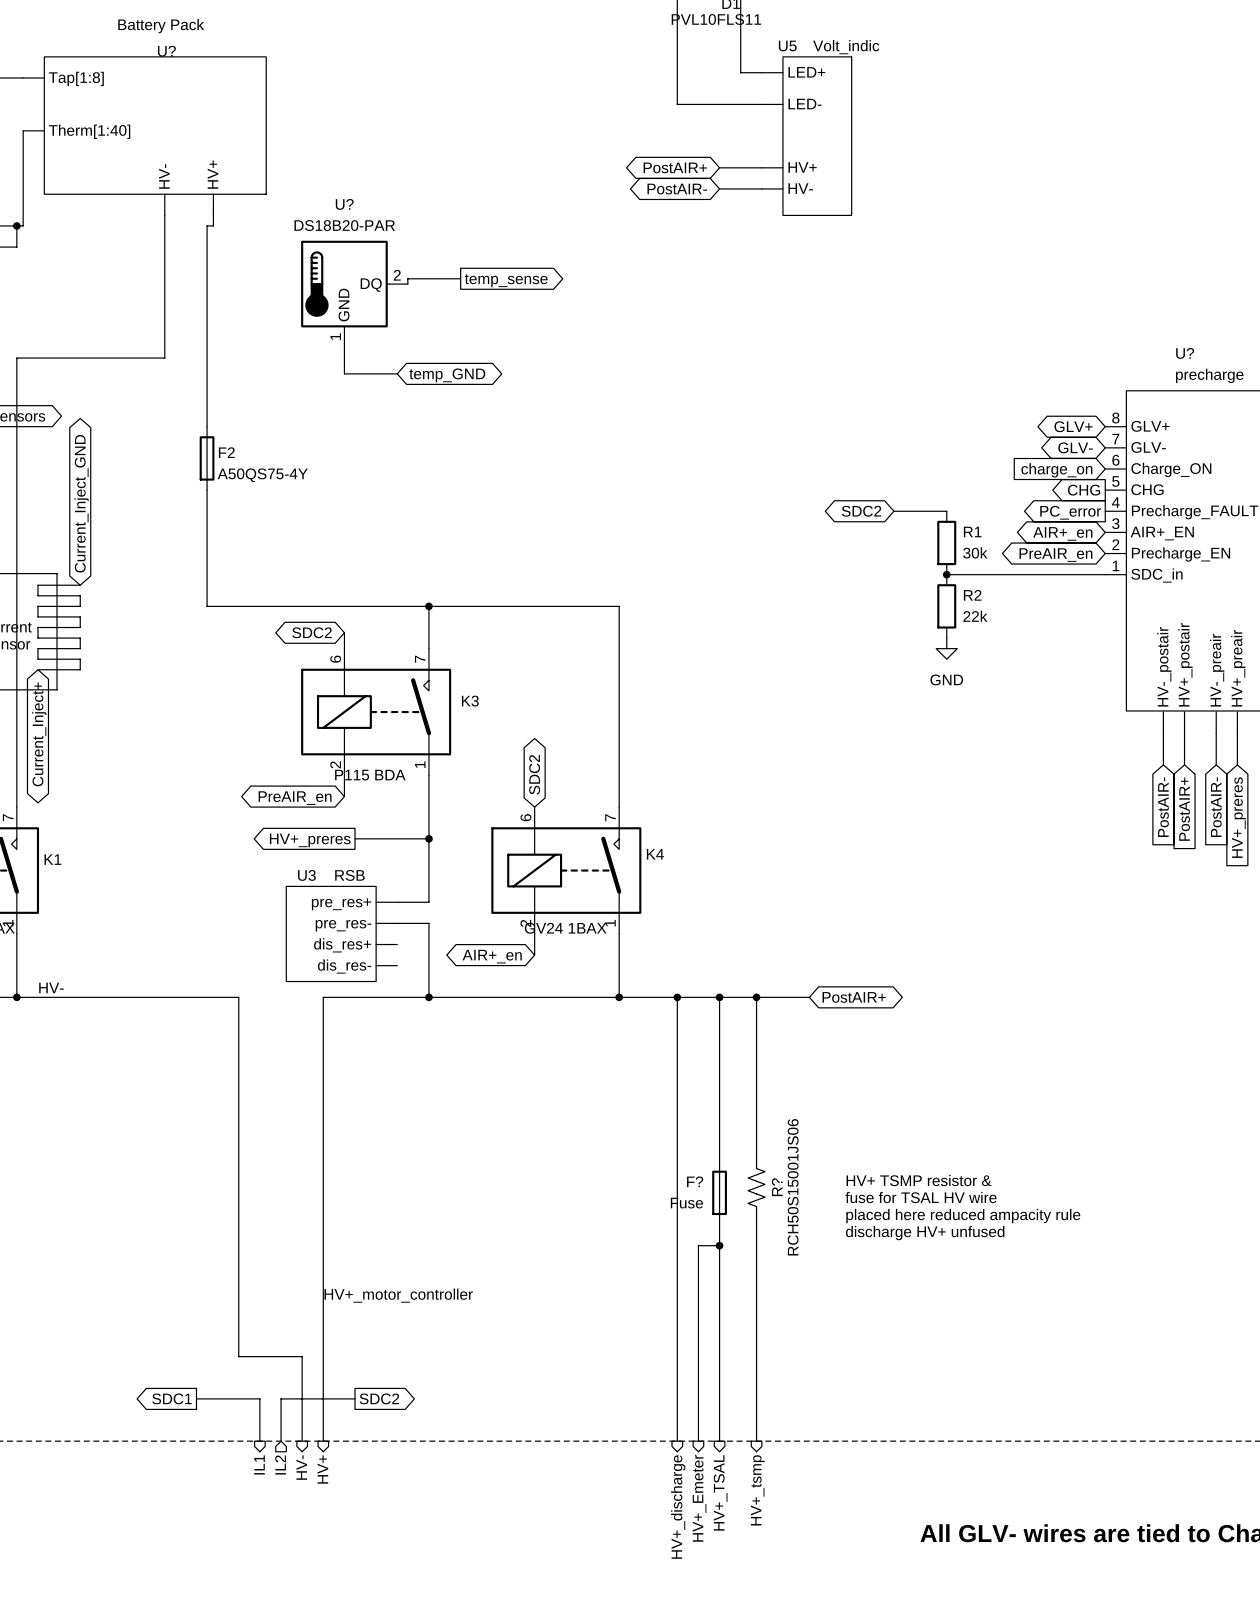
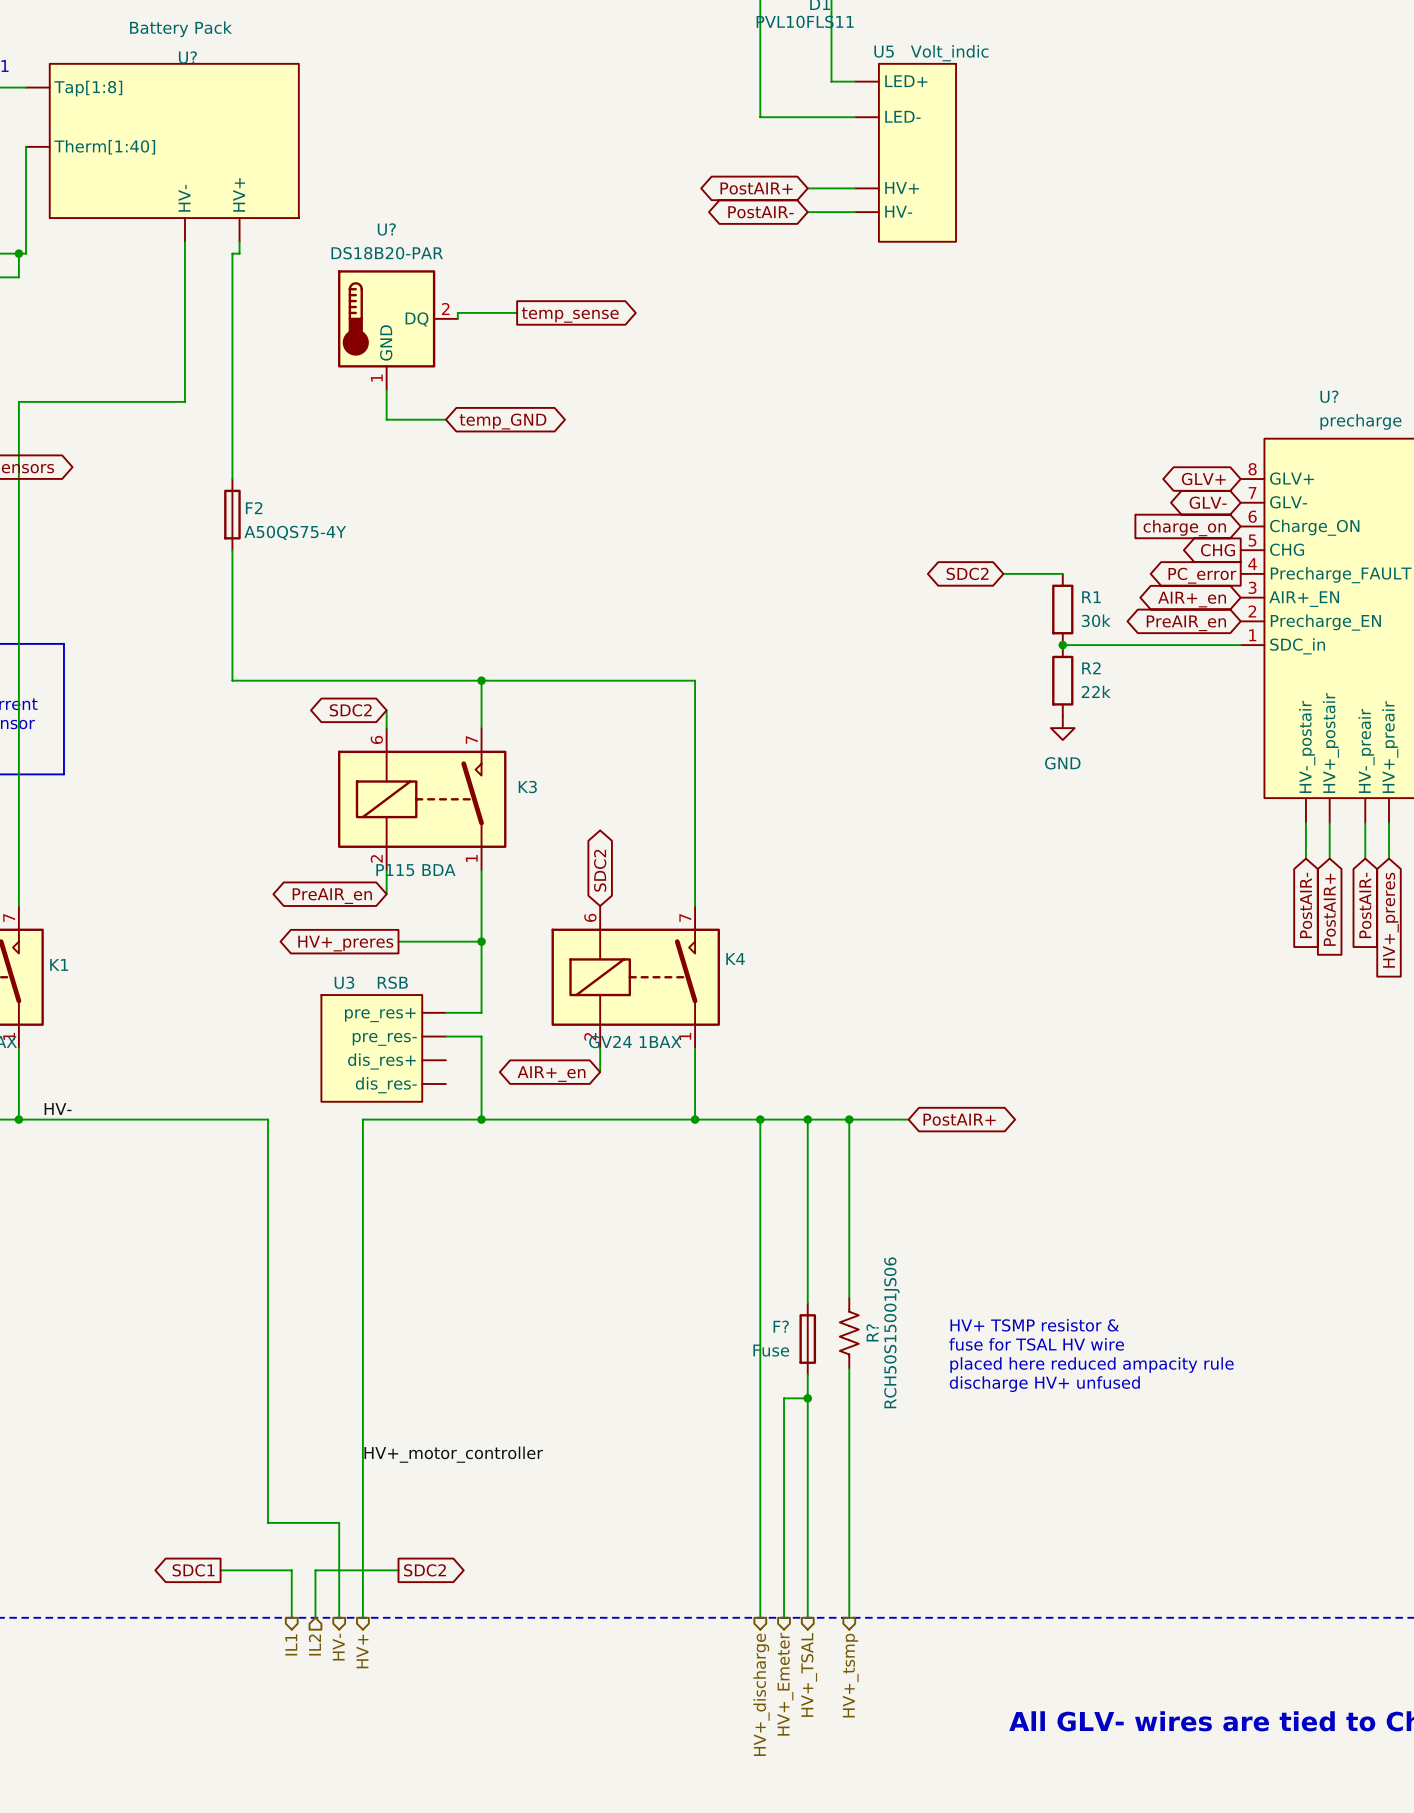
global label: Current_Inject_GND (81, 503) -> none
wire: (80, 585) (37, 585) (37, 595) (80, 595) (80, 606) (37, 606) (37, 616) (80, 616) (80, 627) (37, 627) (37, 638) (80, 638) (80, 648) (37, 648) (37, 659) (80, 659) (80, 669) (37, 669) -> none
global label: Current_Inject+ (39, 734) -> none

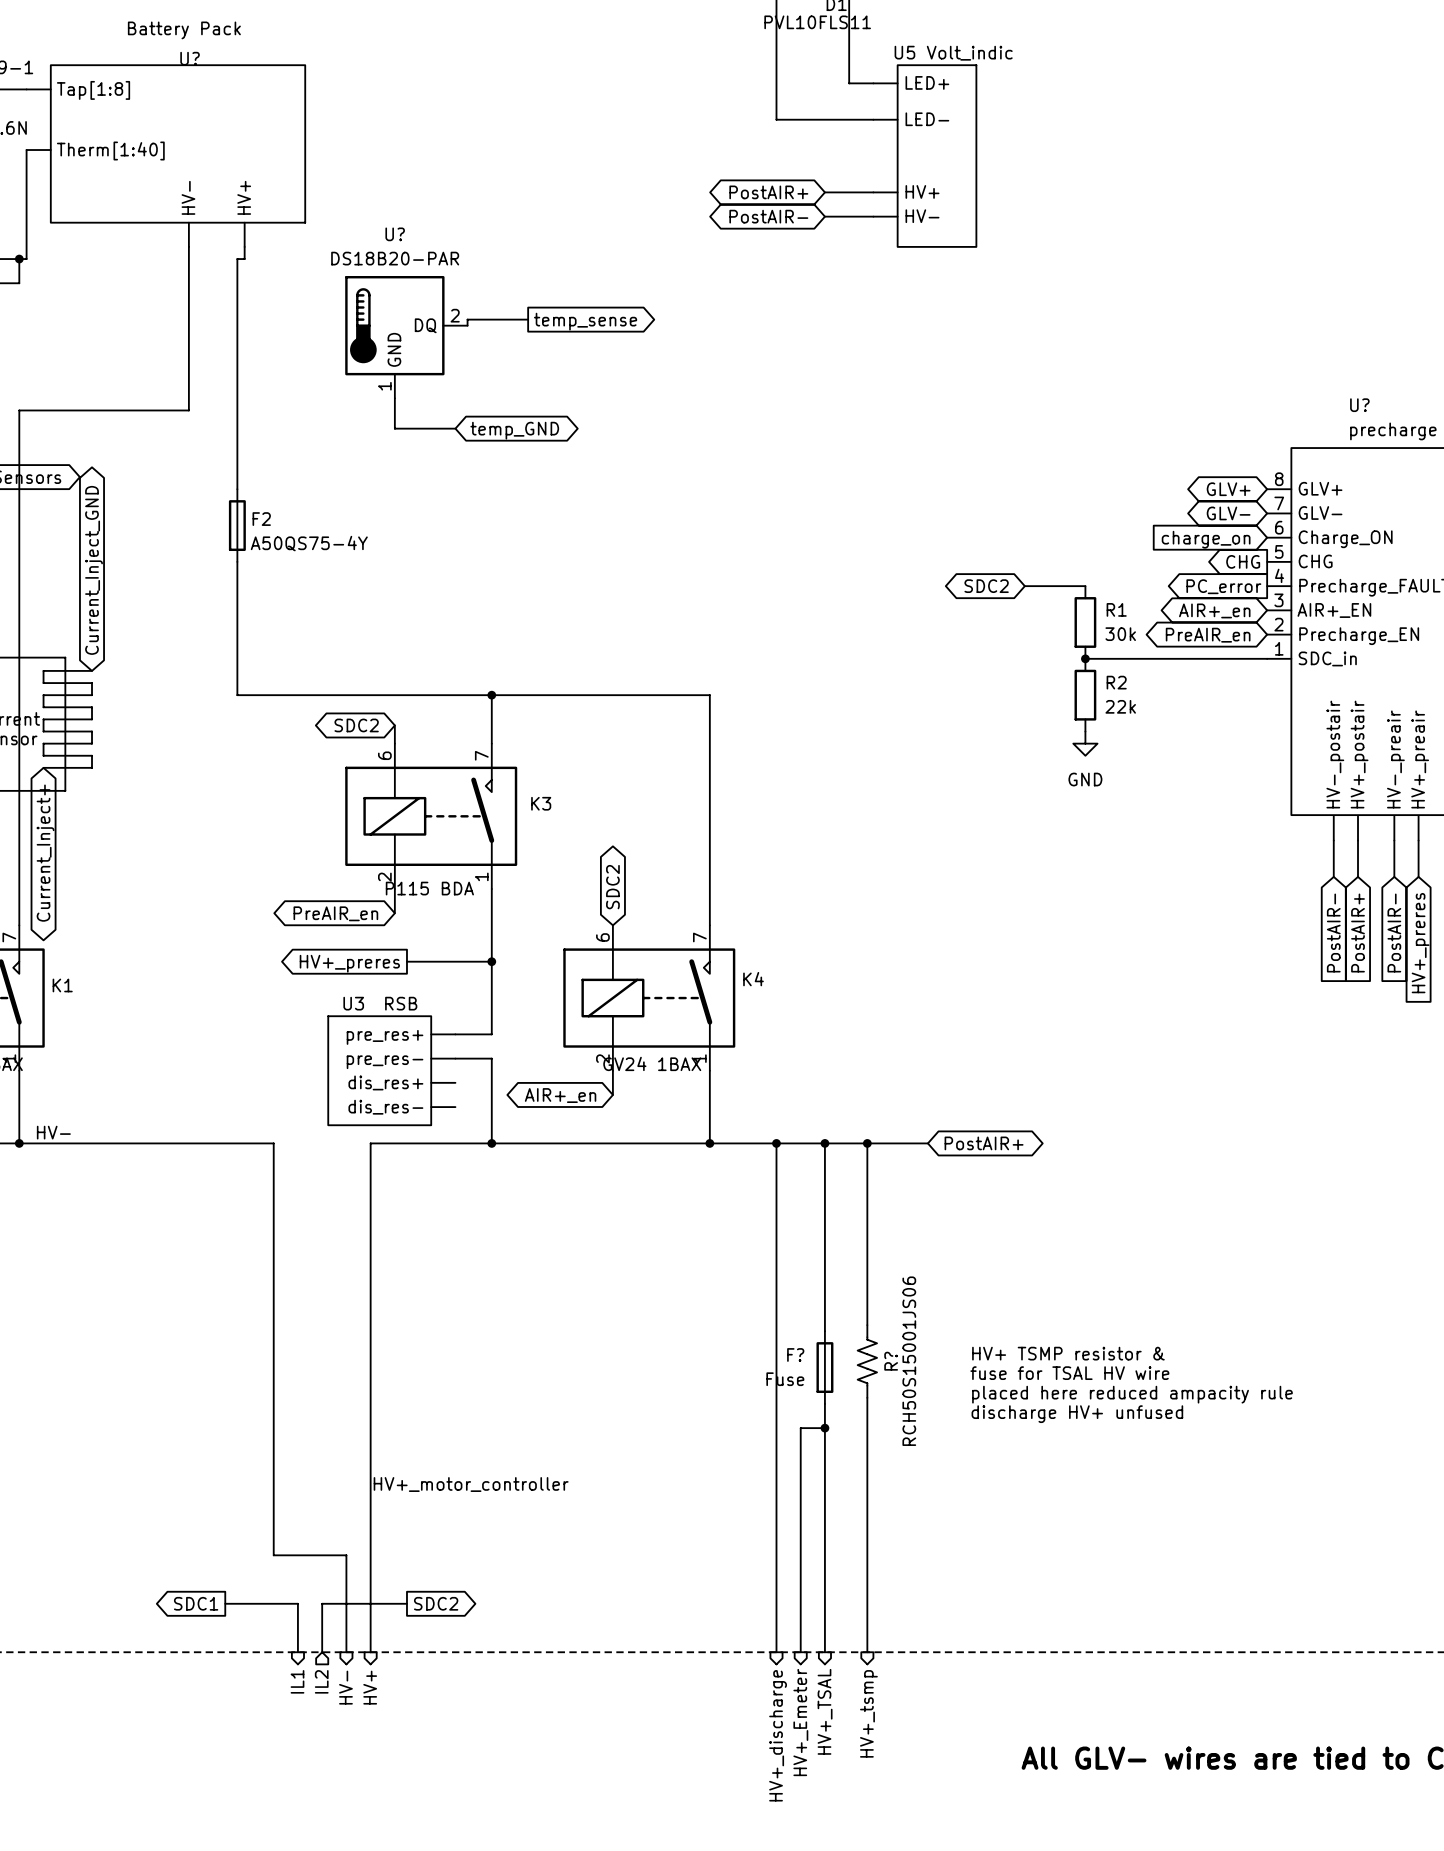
global label: none -> Current_Inject_GND (94, 570)
wire: none -> (92, 670) (43, 670) (43, 683) (92, 683) (92, 695) (43, 695) (43, 707) (92, 707) (92, 719) (43, 719) (43, 731) (92, 731) (92, 743) (43, 743) (43, 755) (92, 755) (92, 767) (43, 767)
global label: none -> Current_Inject+ (45, 853)

